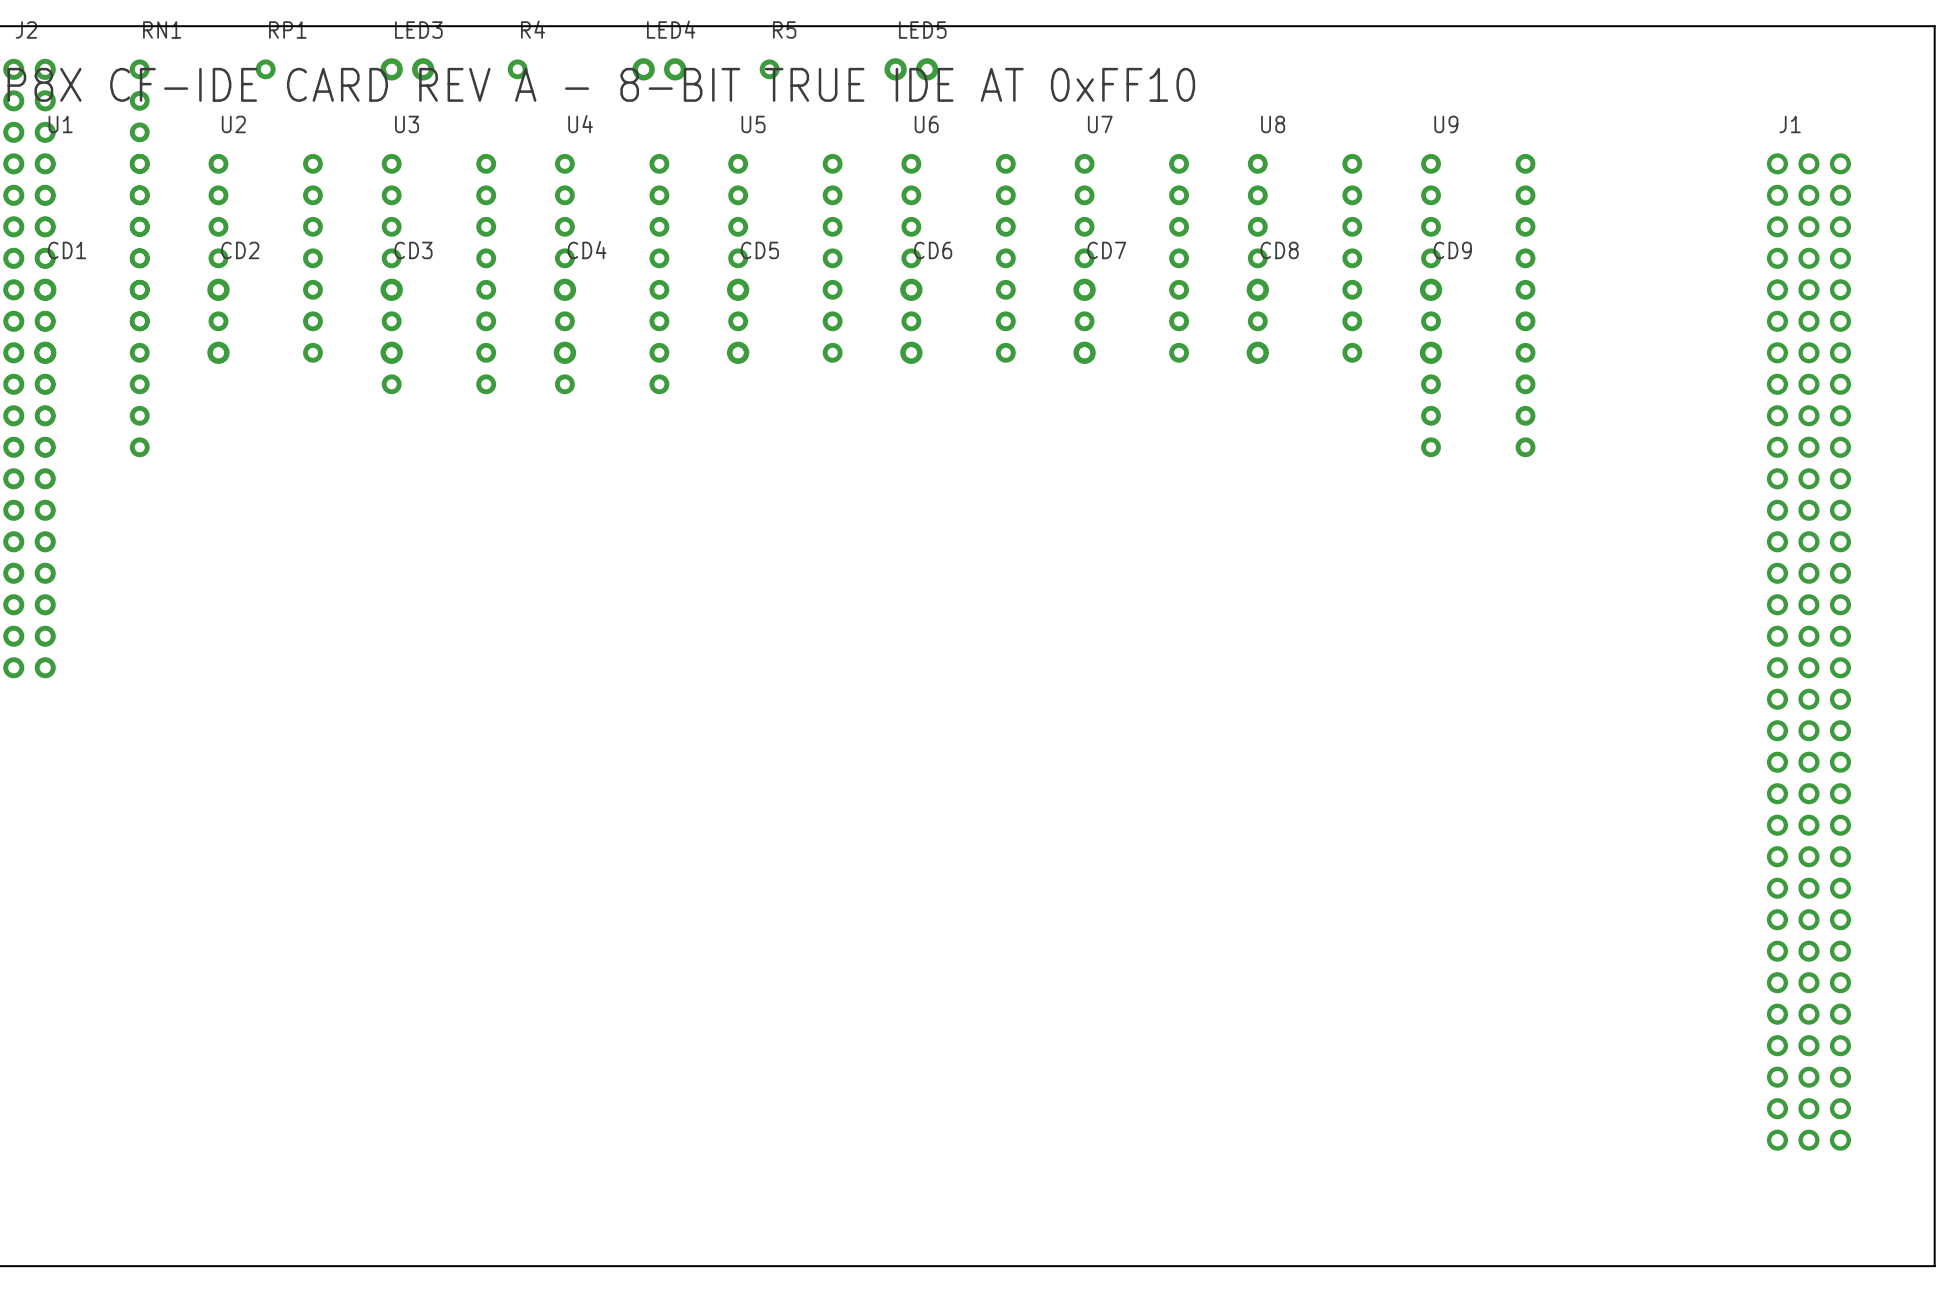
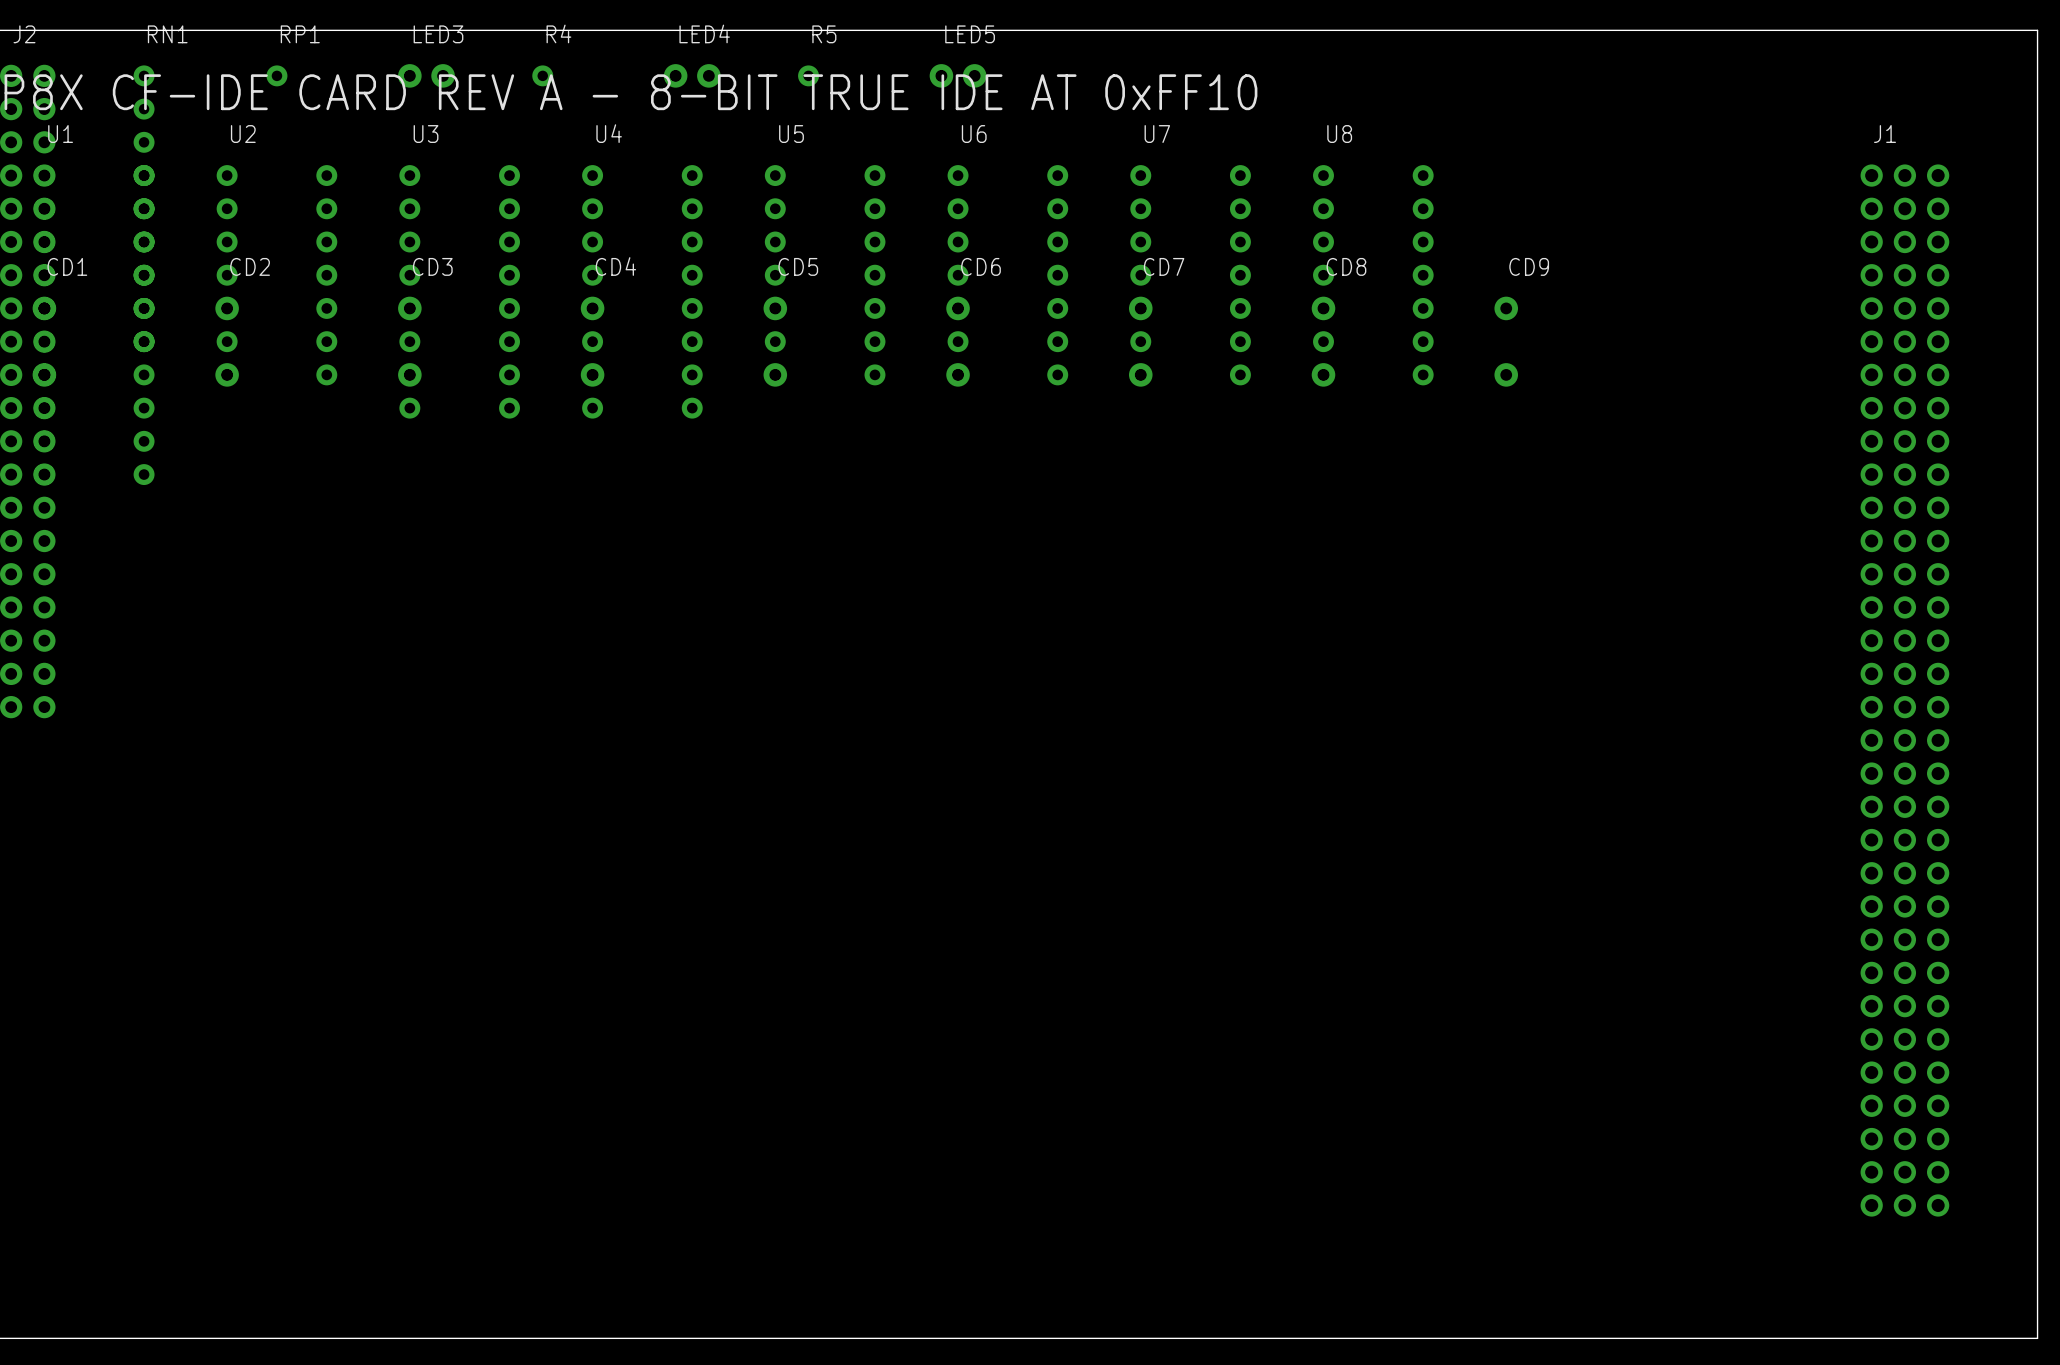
U9: (1478, 305) -> none

